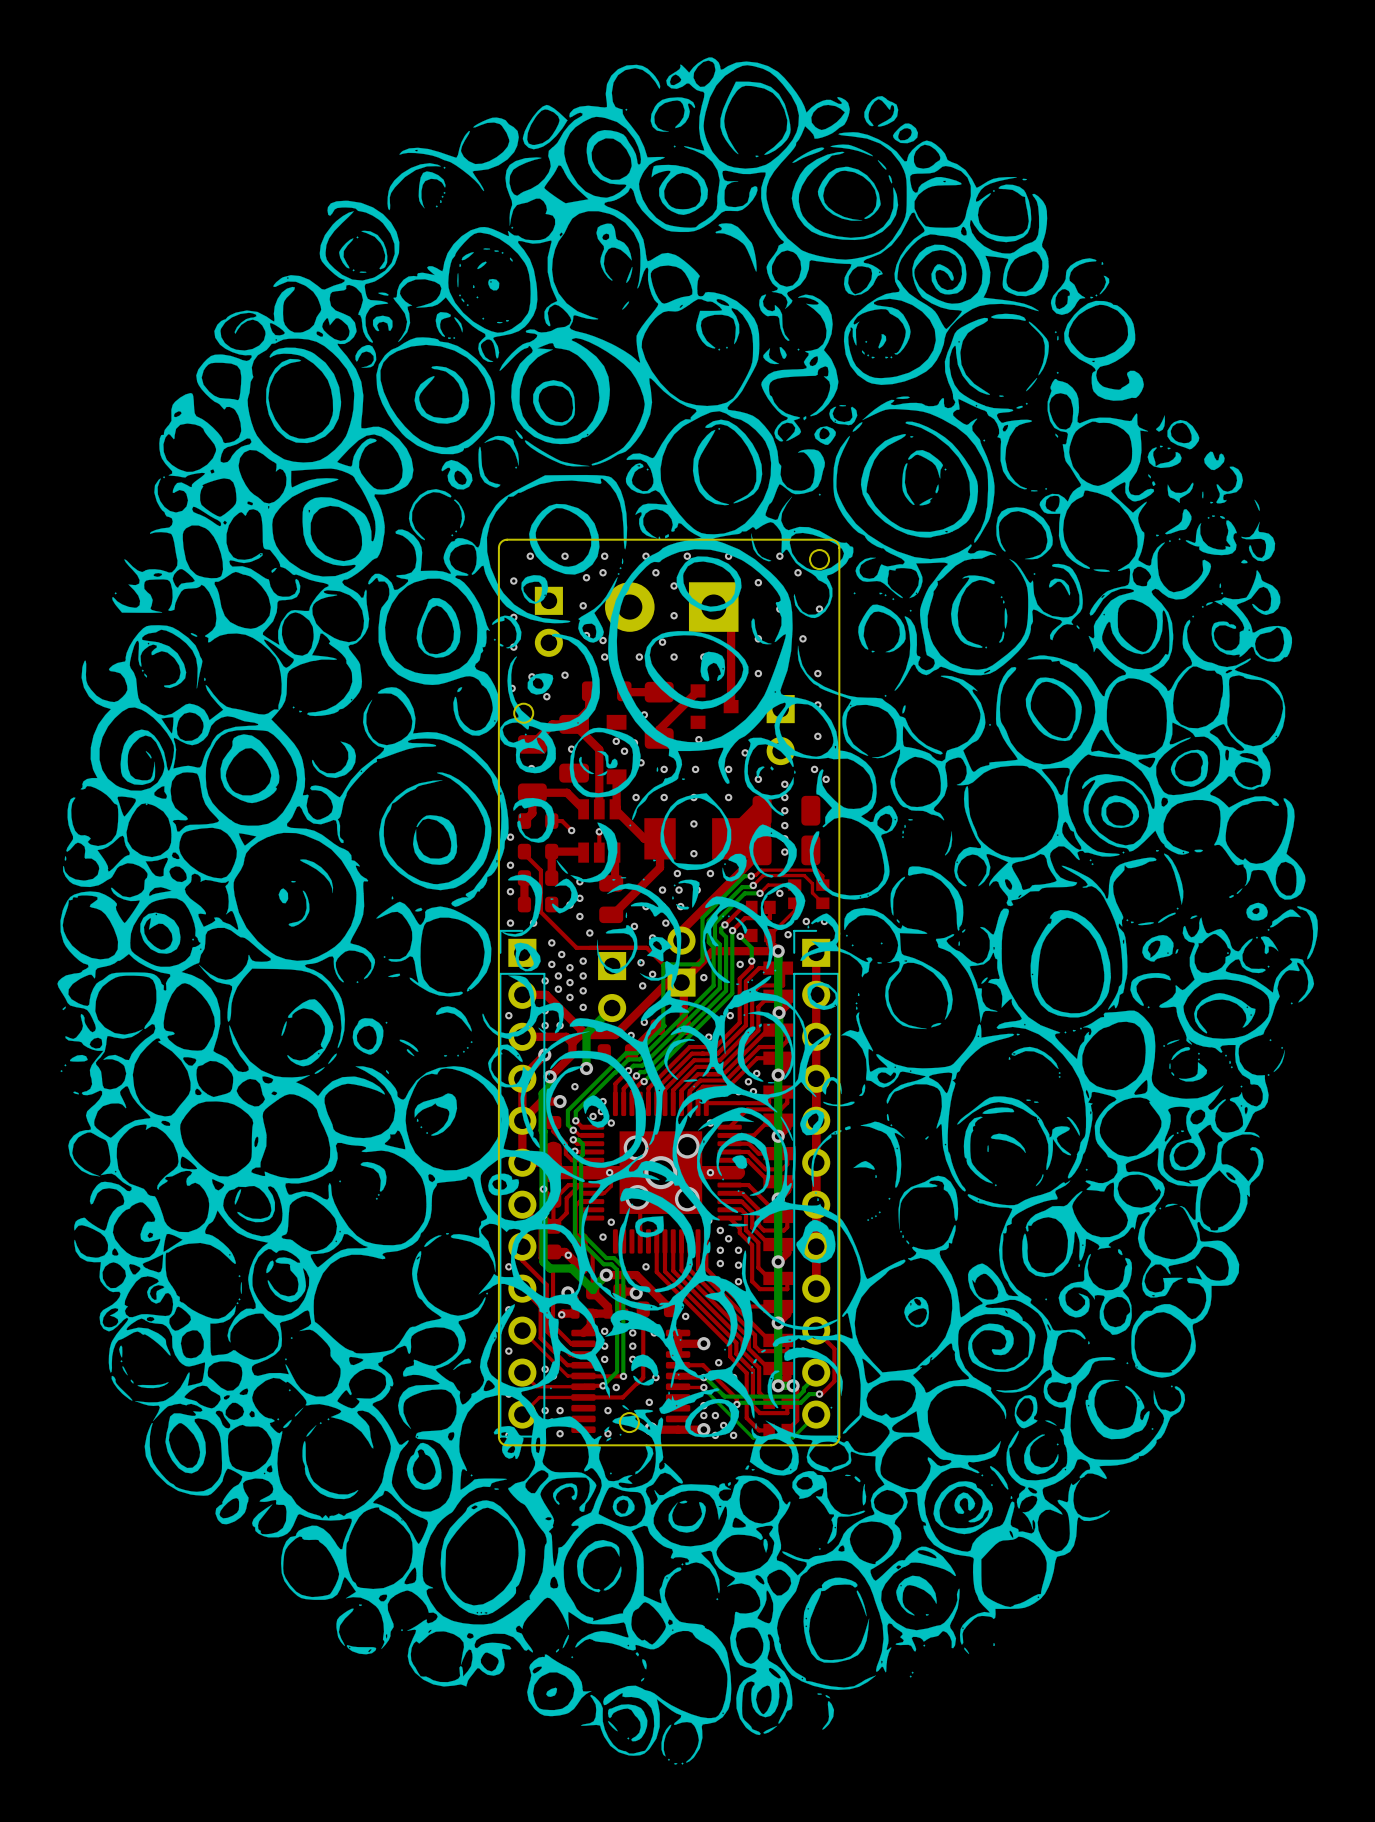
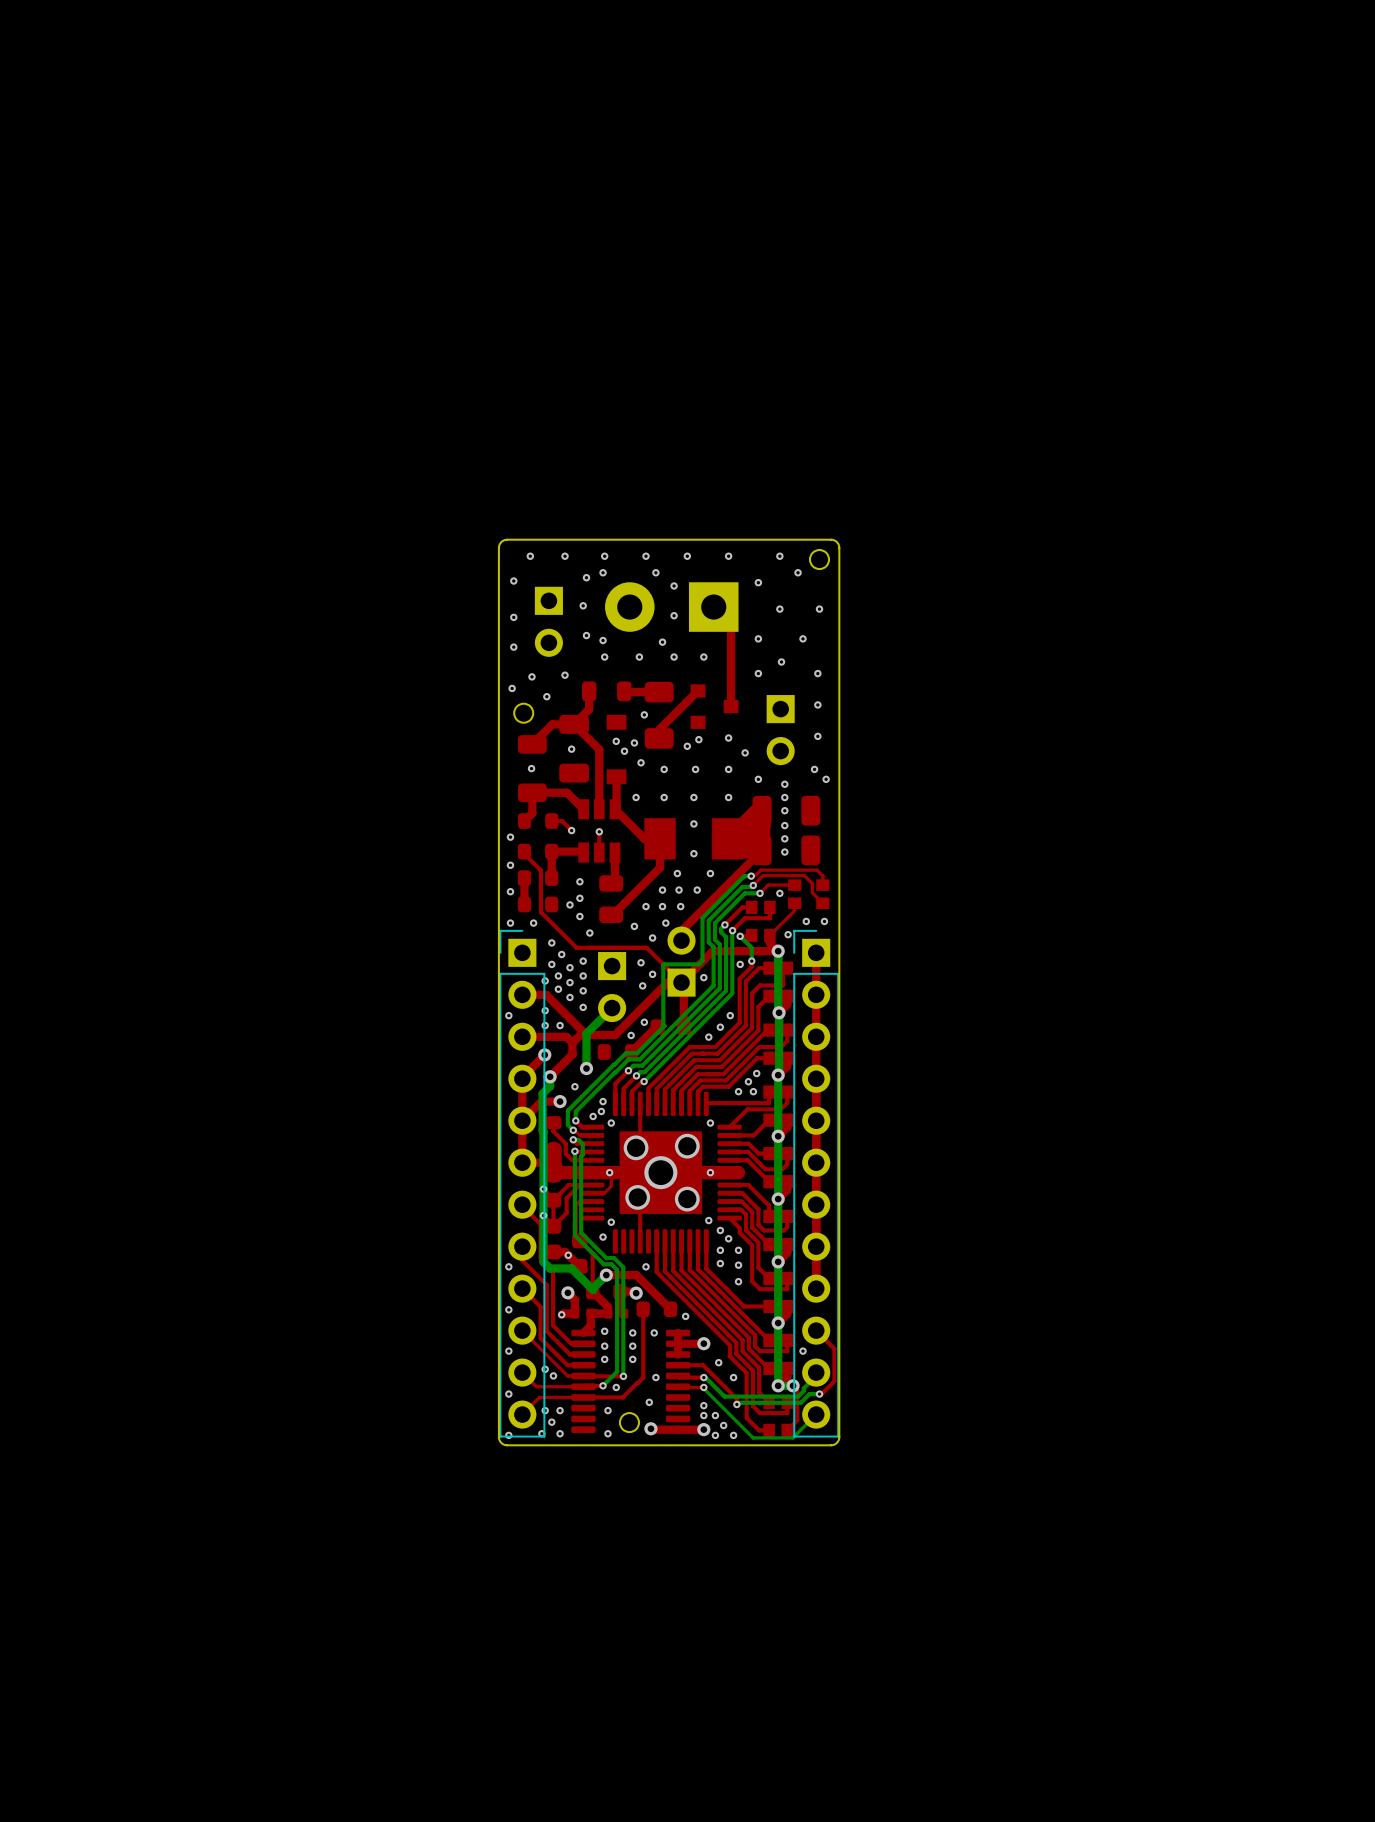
drawing: [57, 57, 1318, 1765] -> none

